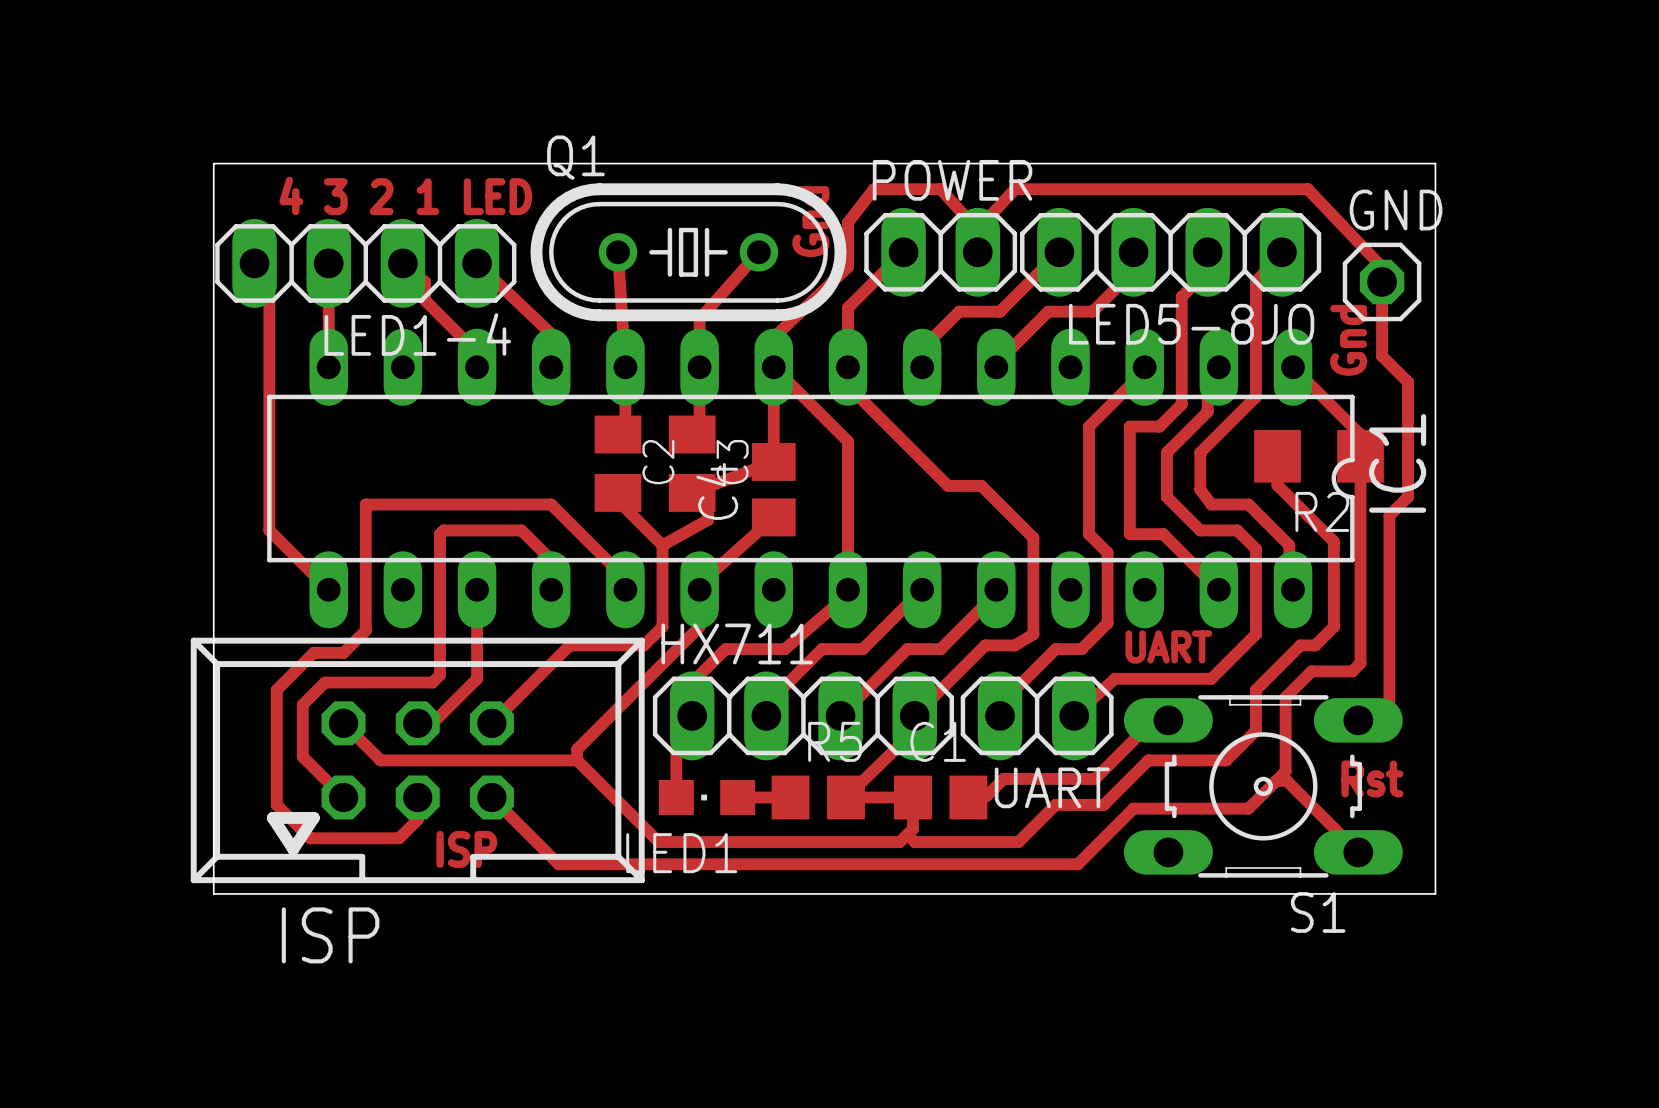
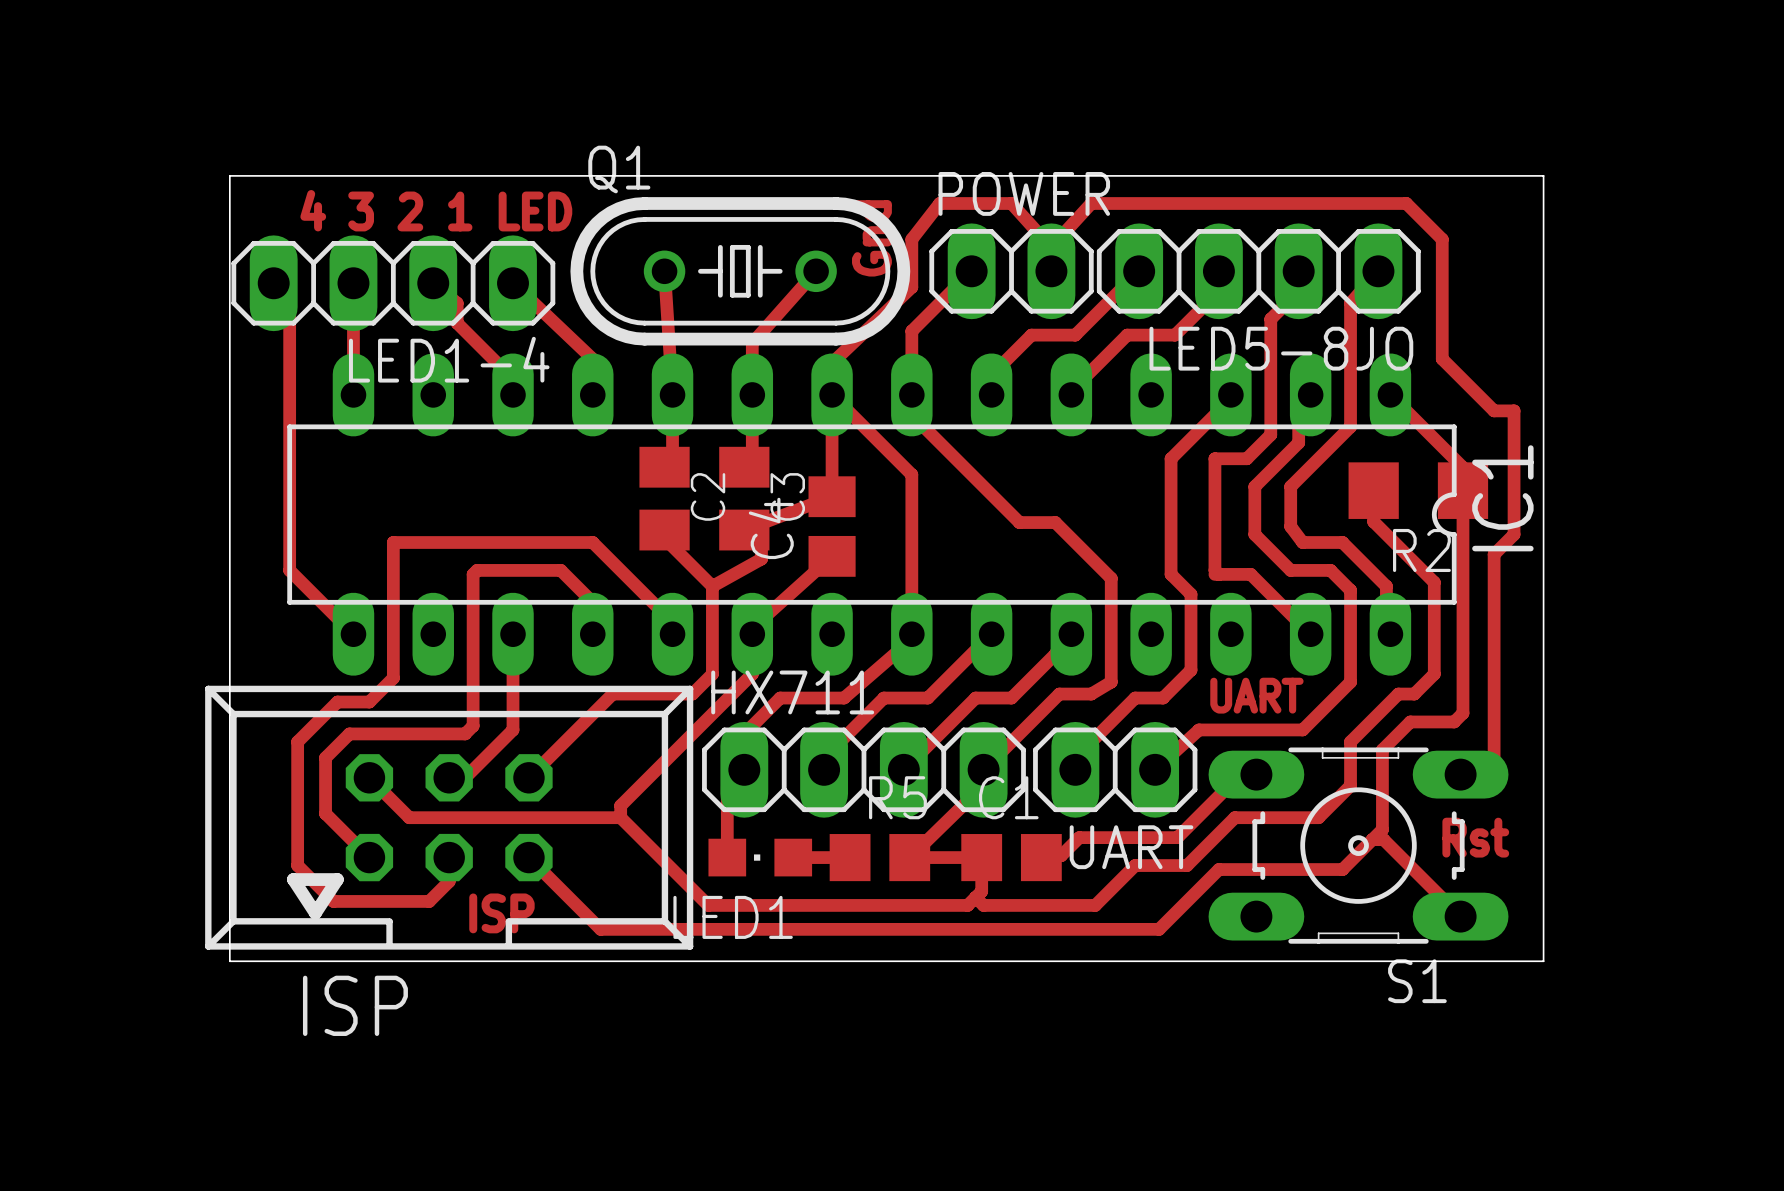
top track: (1307, 189) (1382, 267) (1382, 356) (1408, 382) -> (1406, 203) (1442, 239) (1442, 359) (1494, 410) (1514, 410)
GND: (1382, 281) -> none
text: Gnd (1348, 340) -> none

